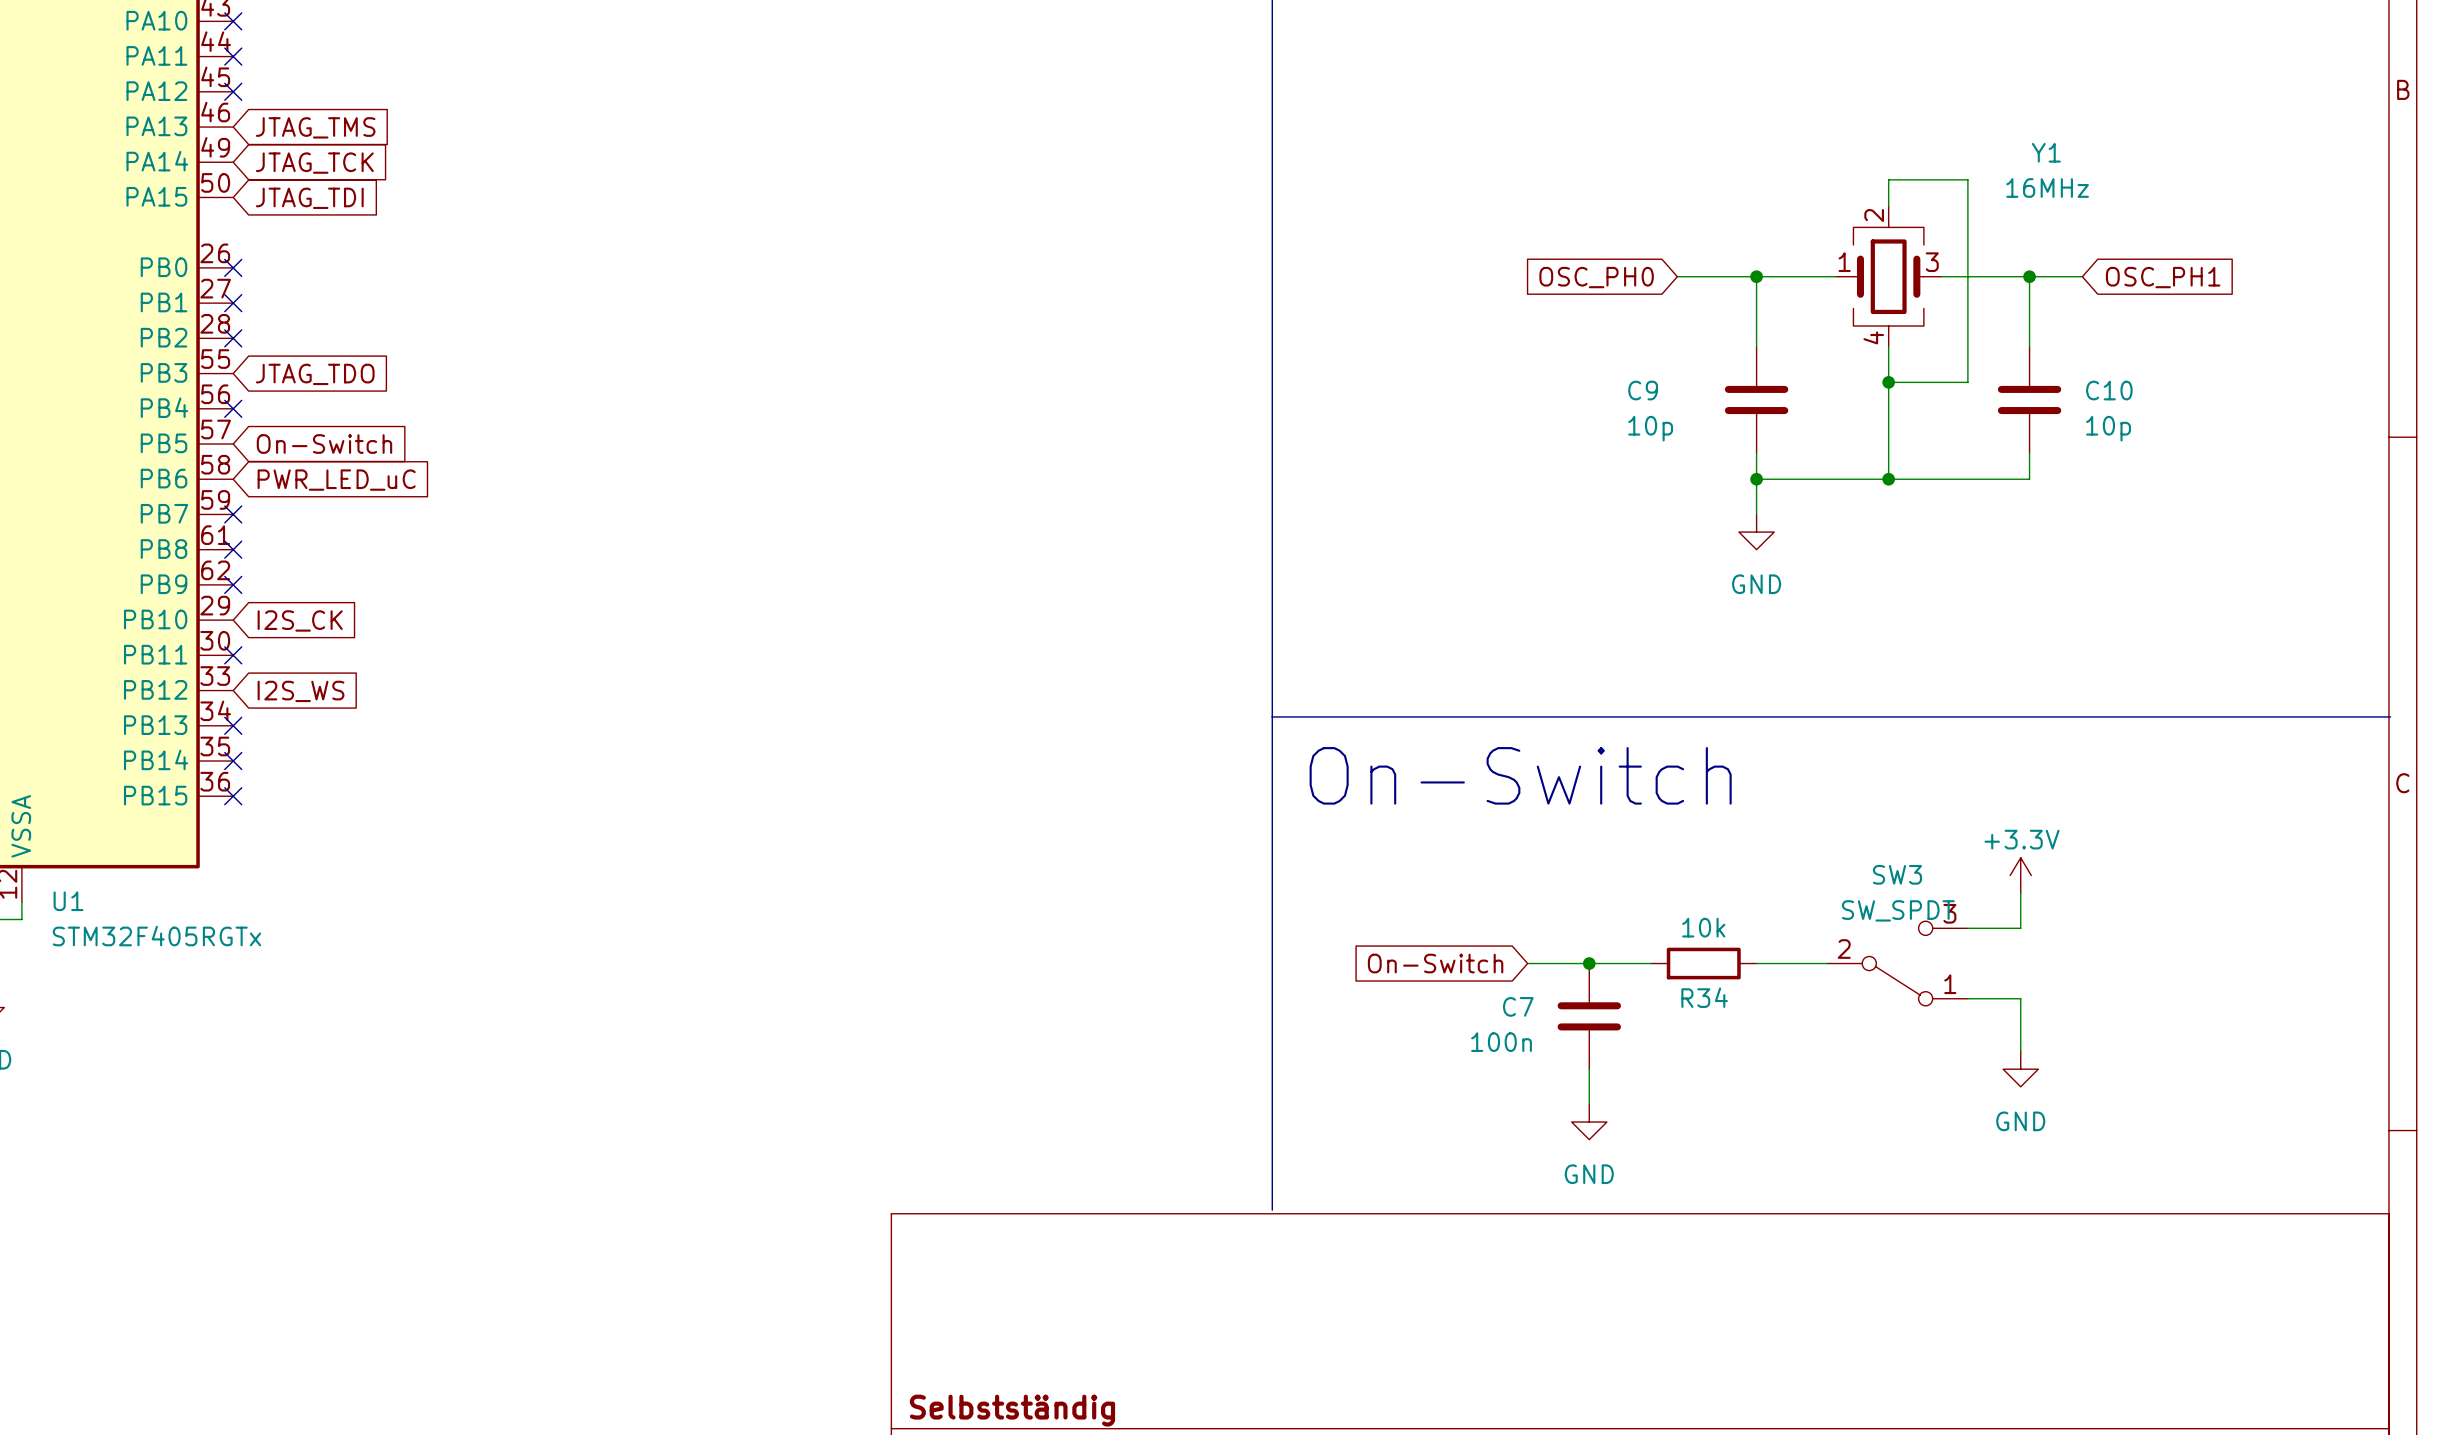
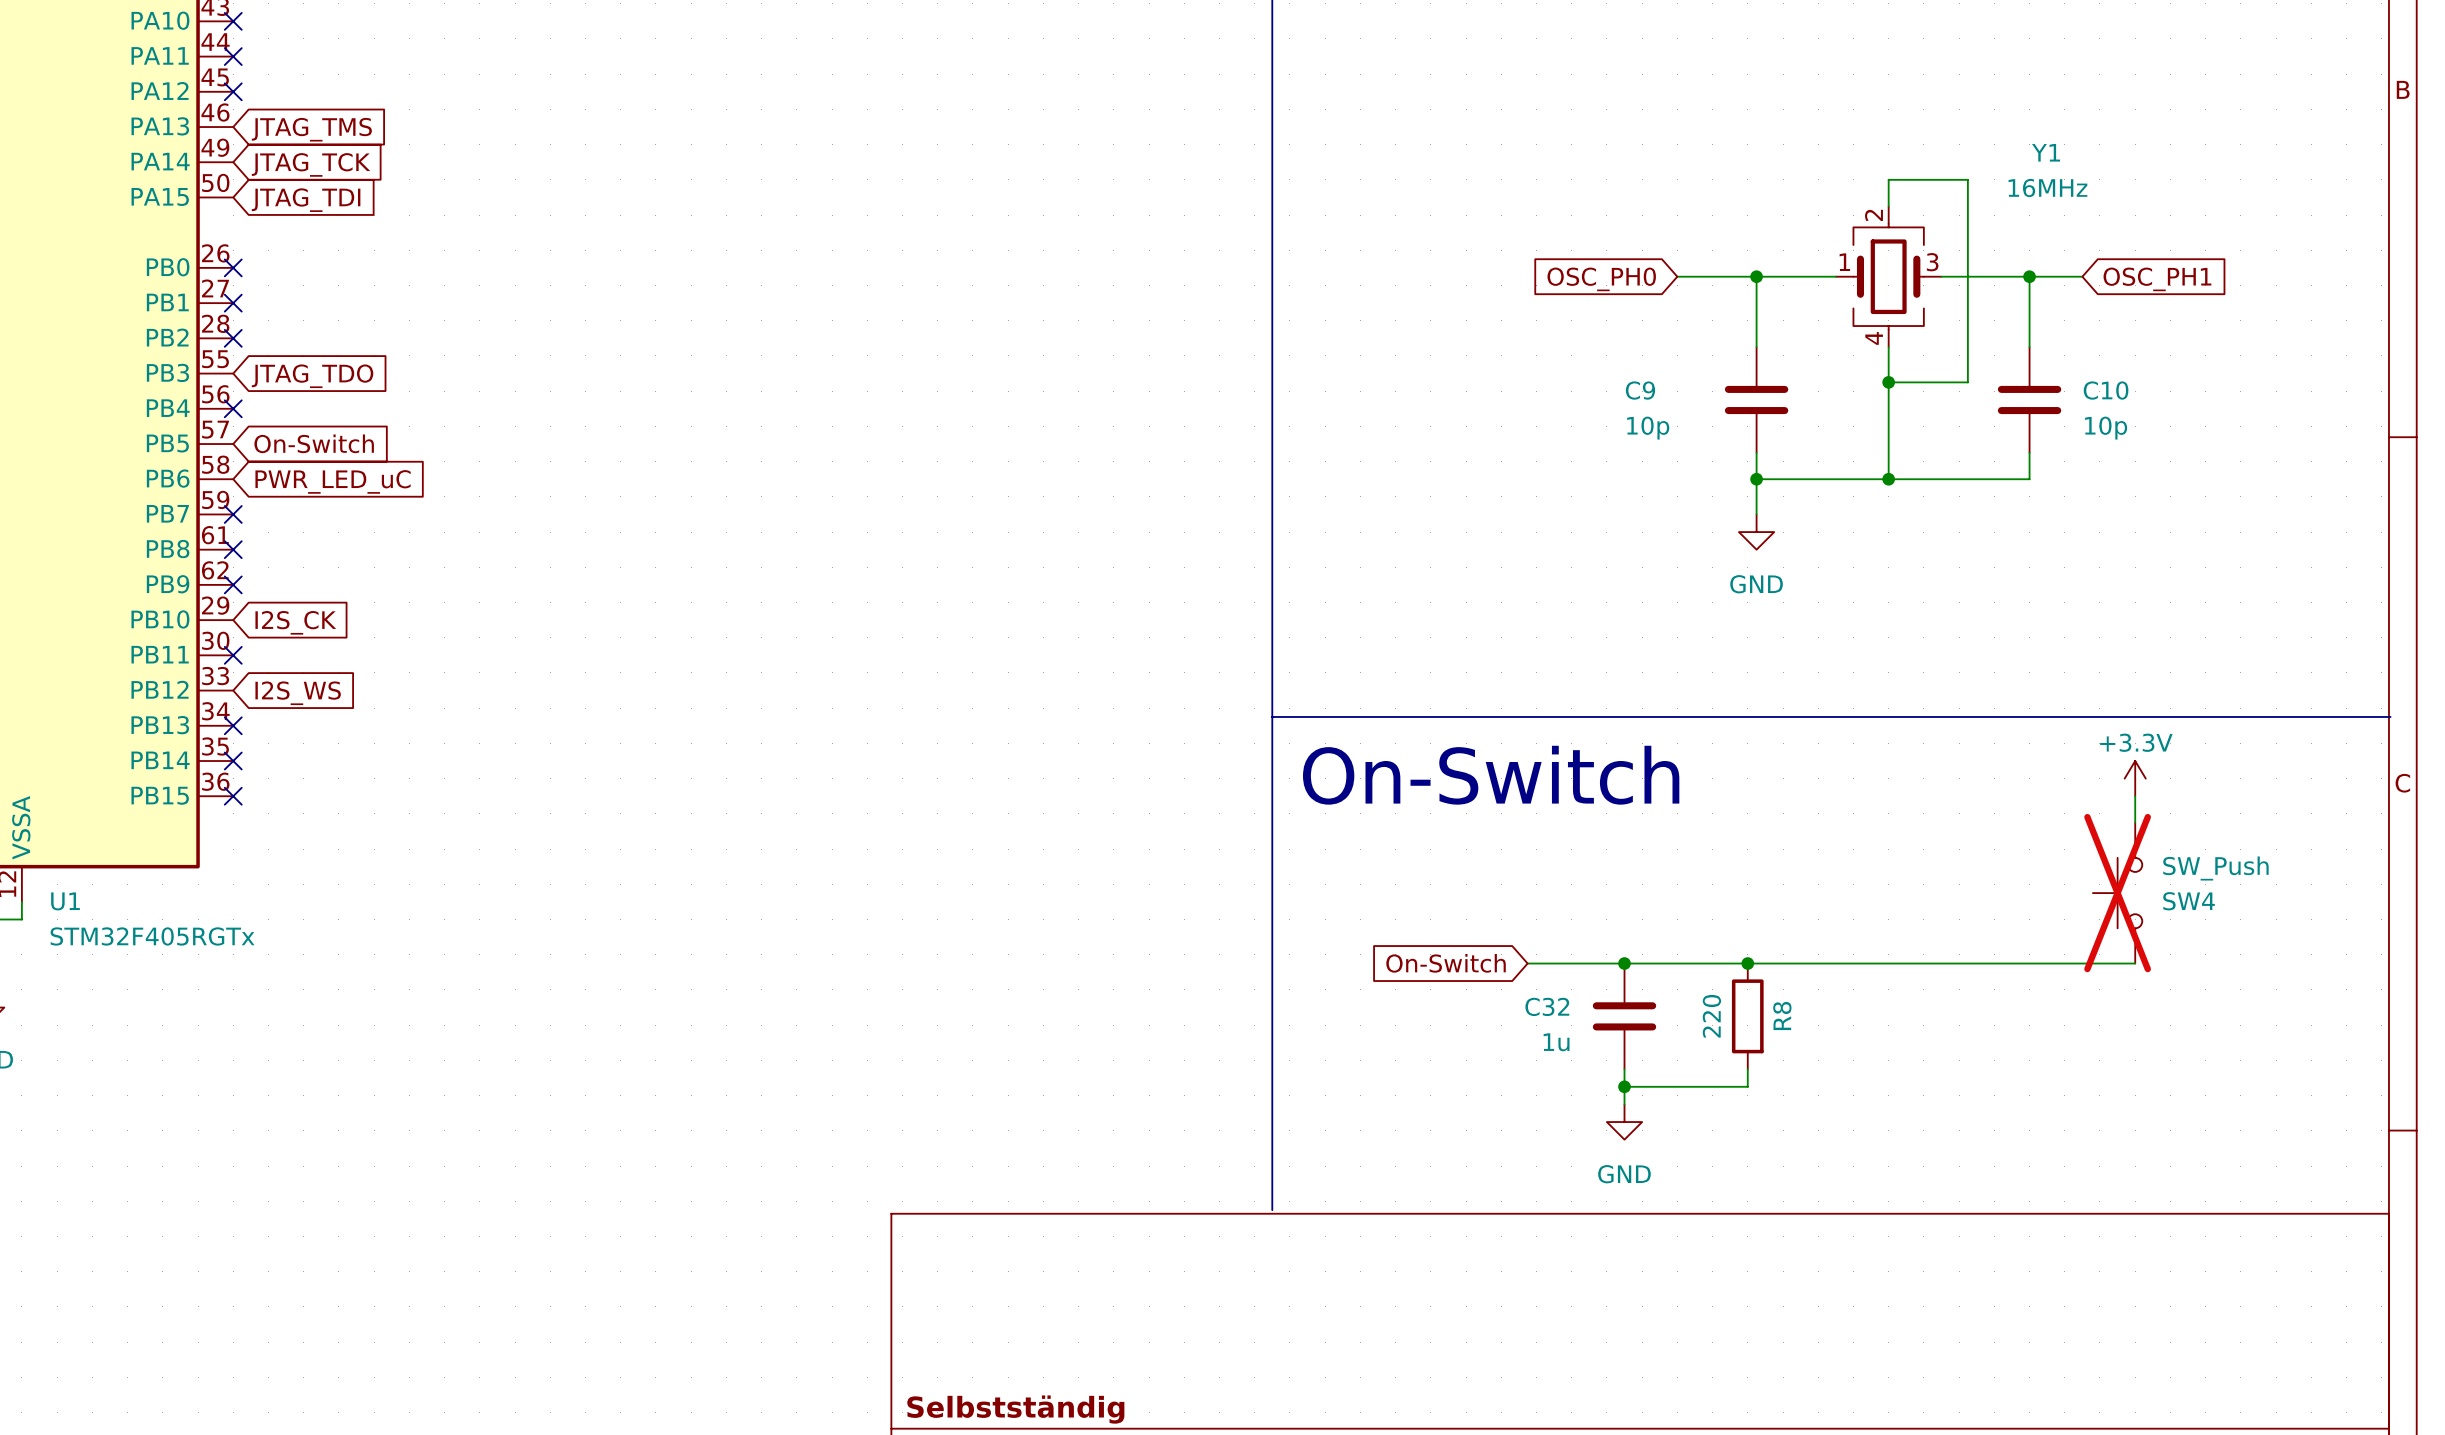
wire: none -> (2135, 796) (2135, 822)
power symbol position: +3.3V (2020, 875) -> +3.3V (2135, 778)
wire: (2020, 893) (2020, 928) (1967, 928) -> none
SW4: none -> SW_Push (2117, 893)
junction position: (1589, 963) -> (1624, 963)
wire: none -> (1650, 963) (1756, 963)
R34: 10k (1703, 963) -> none
junction: none -> (1747, 963)
wire: none -> (1827, 963) (2135, 963)
SW3: SW_SPDT (1897, 963) -> none
wire: (1967, 998) (2020, 998) (2020, 1051) -> none
C7: 100n (1589, 1016) -> none
C32: none -> 1u (1624, 1016)
R8: none -> 220 (1747, 1016)
wire: (1589, 1069) (1589, 1104) -> (1624, 1069) (1624, 1104)
wire: none -> (1747, 1069) (1747, 1086) (1624, 1086)
power symbol: GND (2020, 1069) -> none
junction: none -> (1624, 1086)
power symbol position: GND (1589, 1122) -> GND (1624, 1122)

